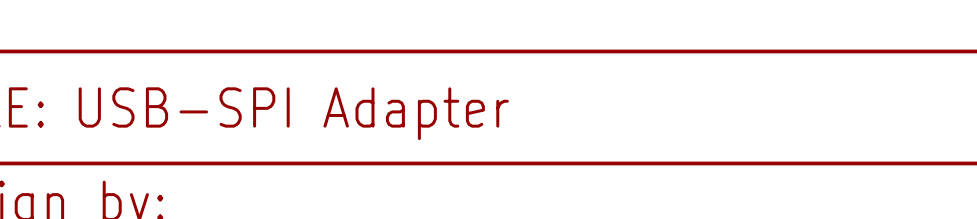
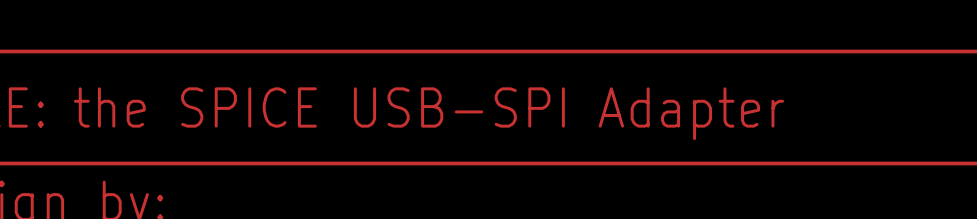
text: USB-SPI Adapter (293, 113) -> the SPICE USB-SPI Adapter (428, 113)

